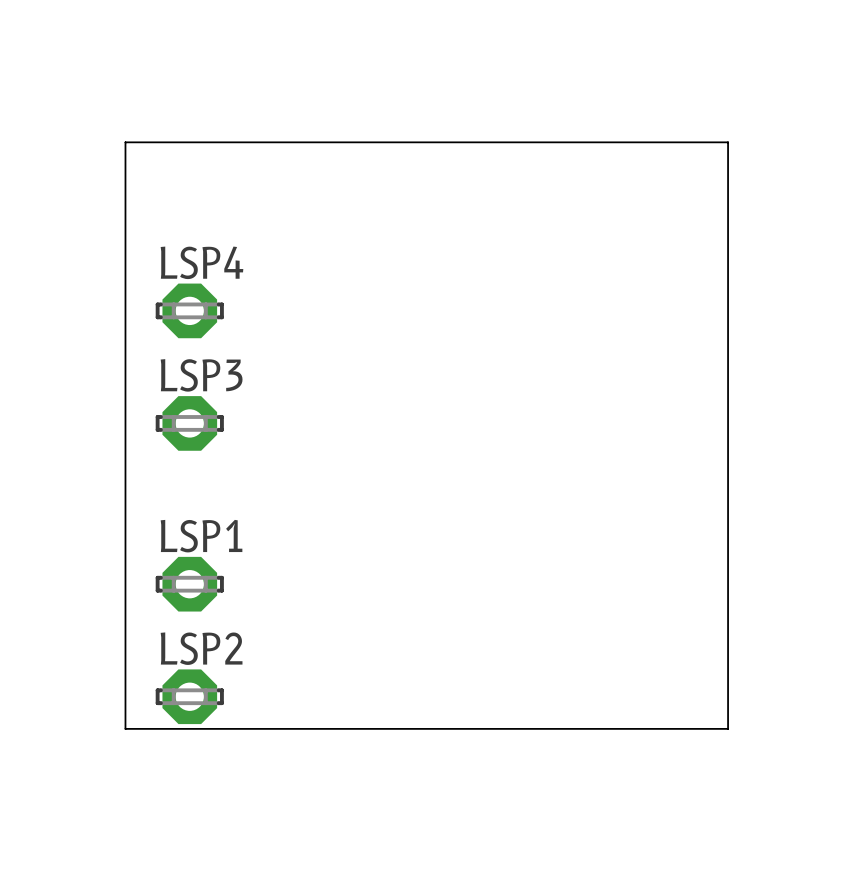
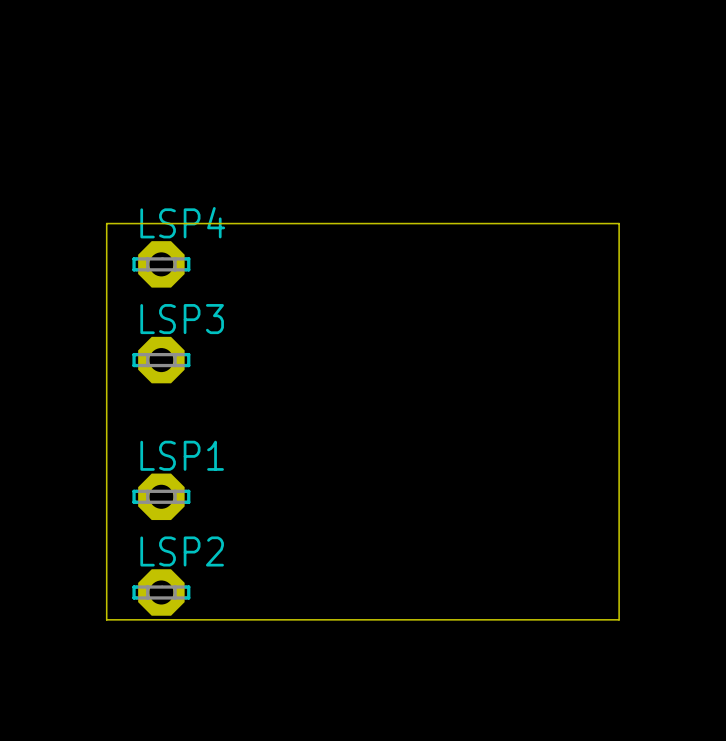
board edge: (125, 262) (125, 142) (728, 142) (728, 262) -> (106, 223) (619, 223)

